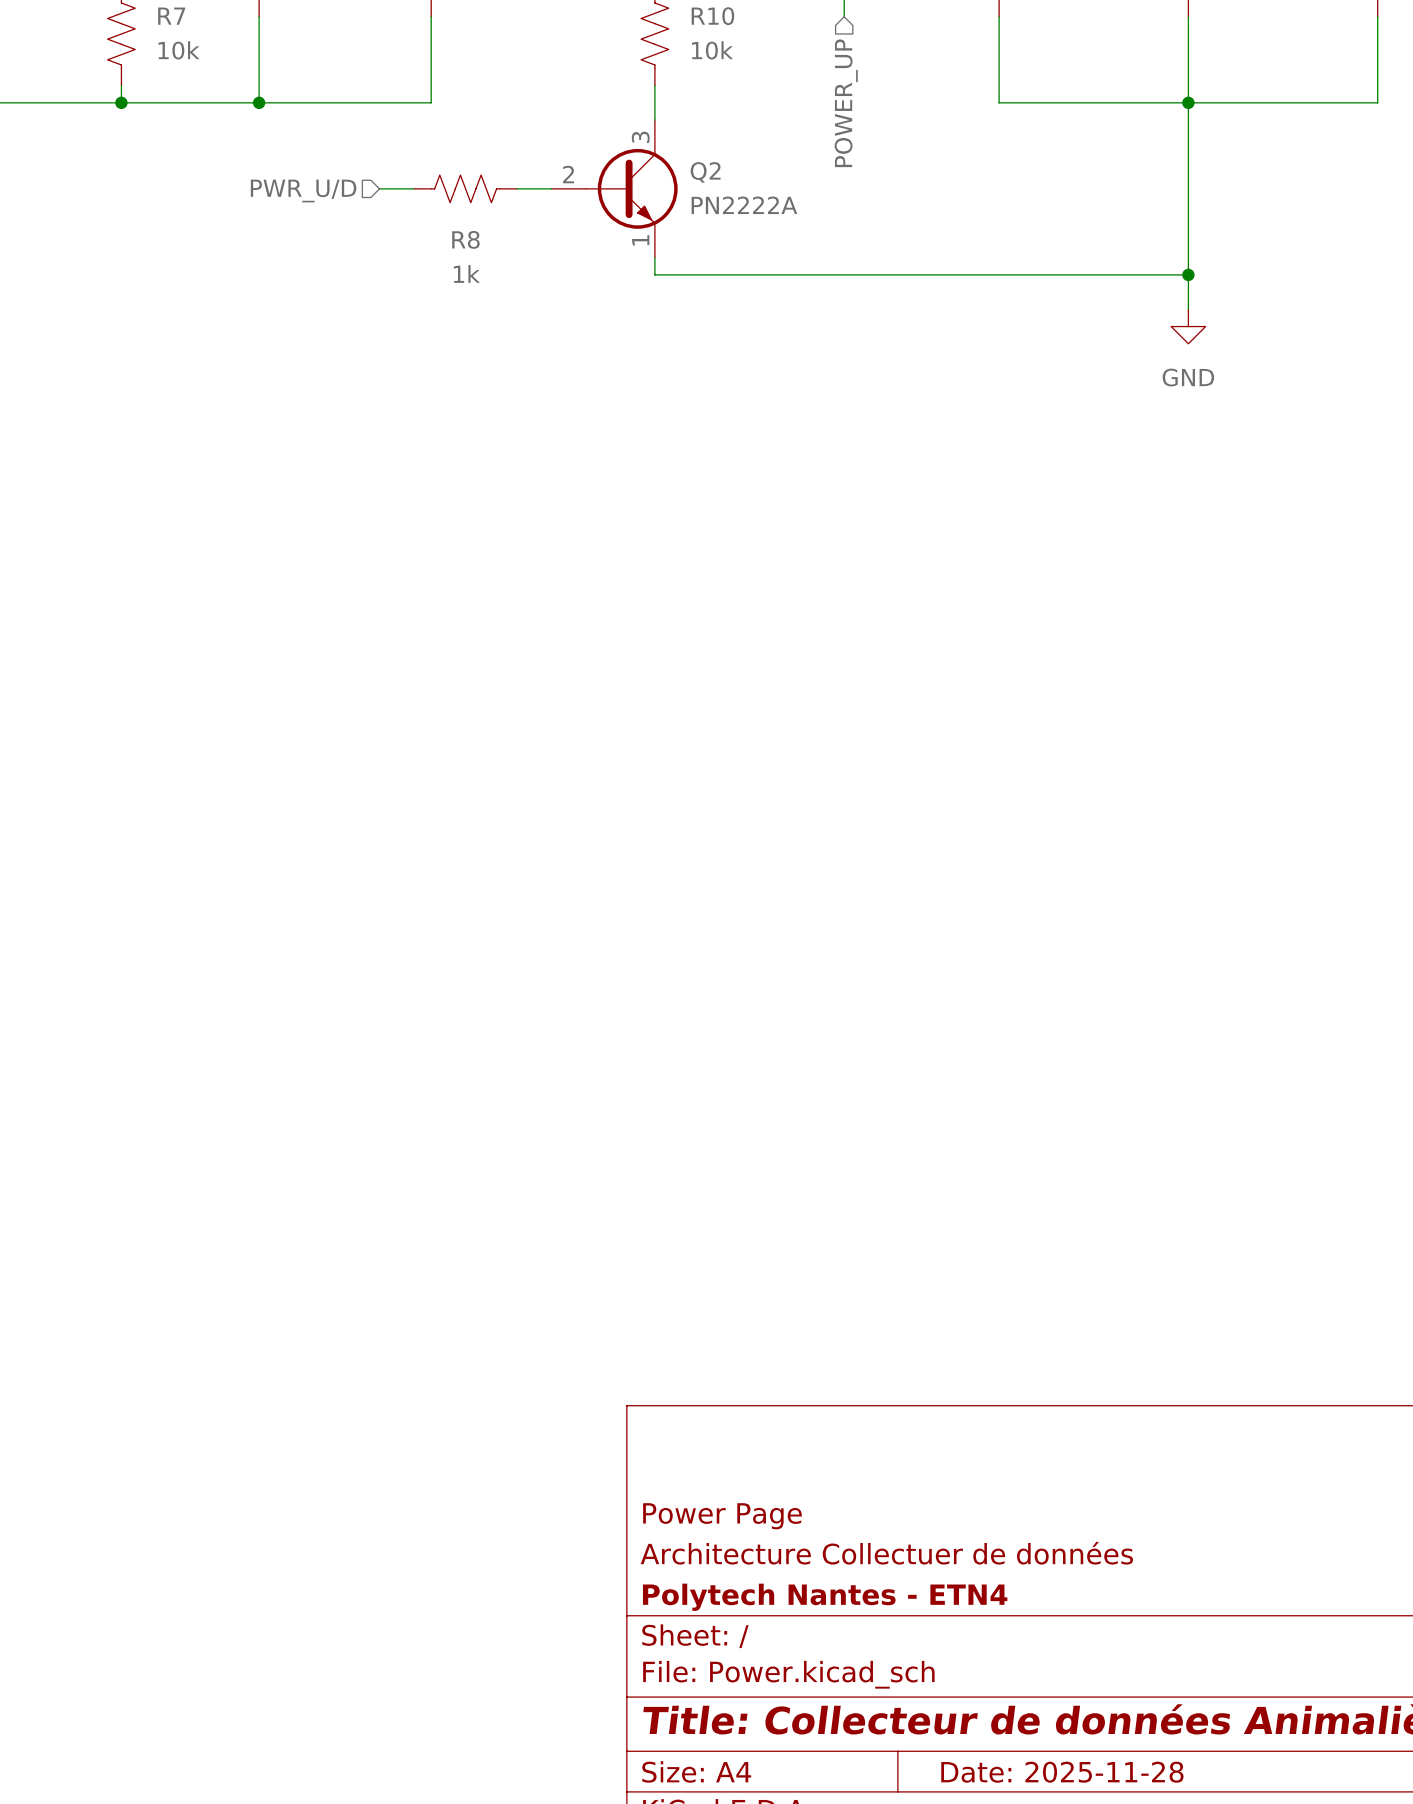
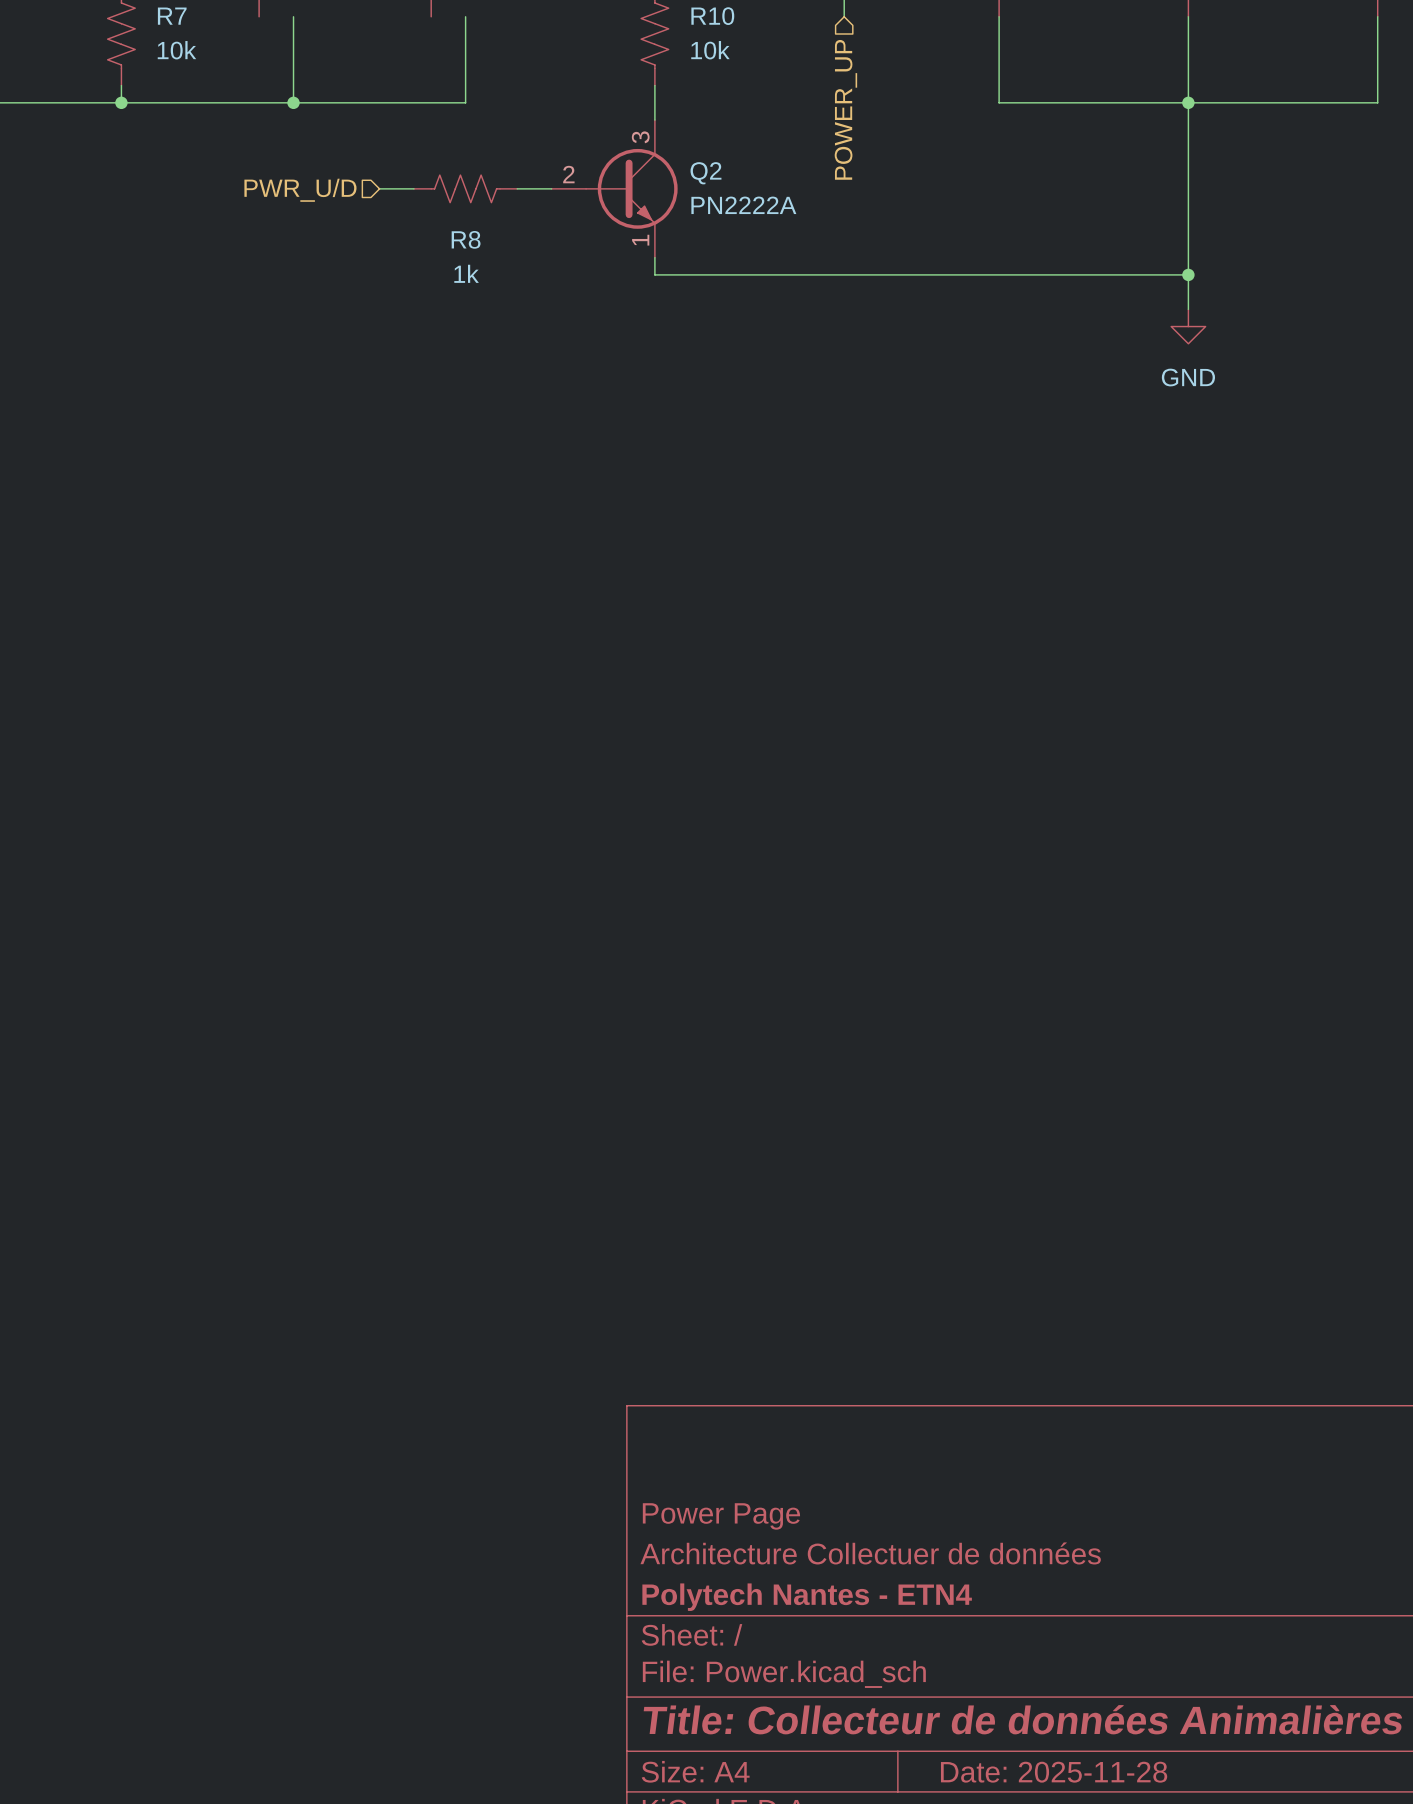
wire: (259, 16) (259, 102) -> (293, 16) (293, 102)
wire: (431, 16) (431, 102) -> (465, 16) (465, 102) (431, 102)
junction position: (259, 102) -> (293, 102)

